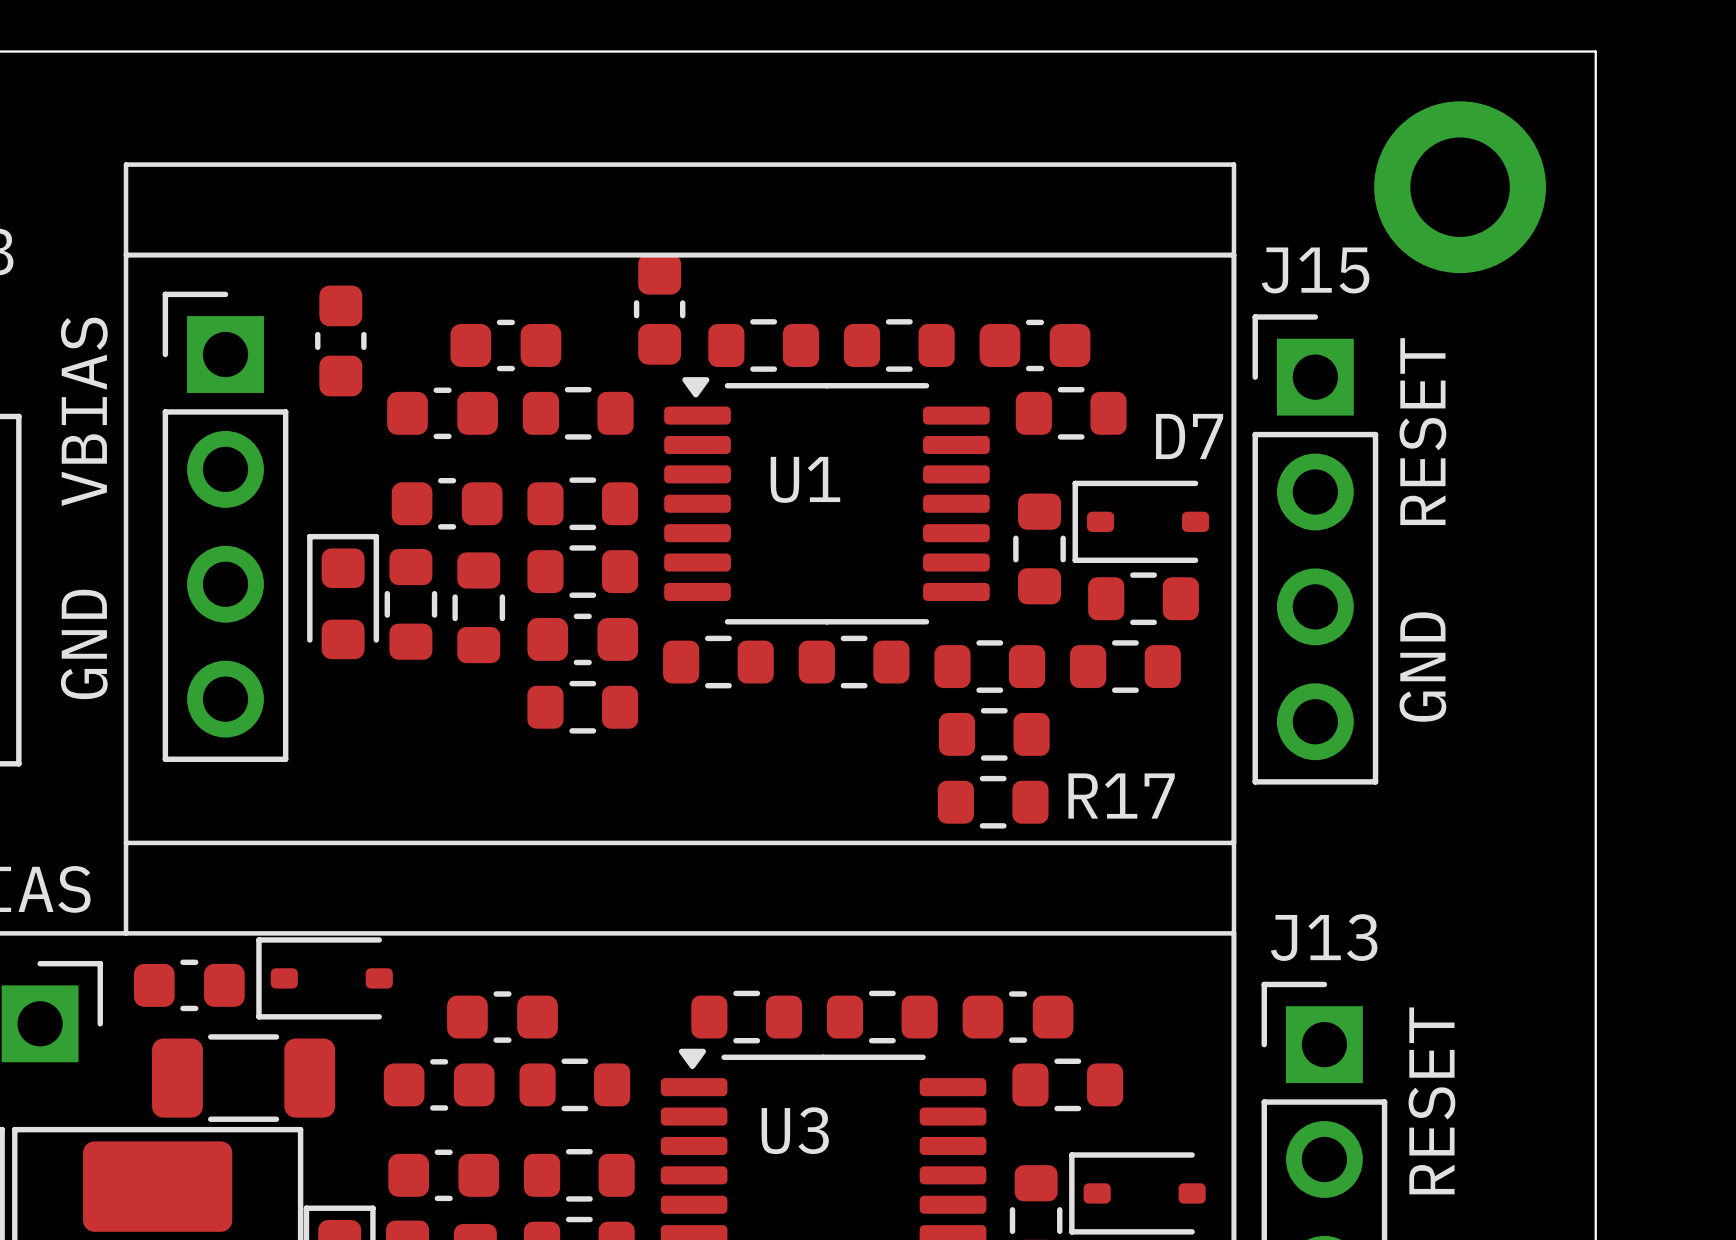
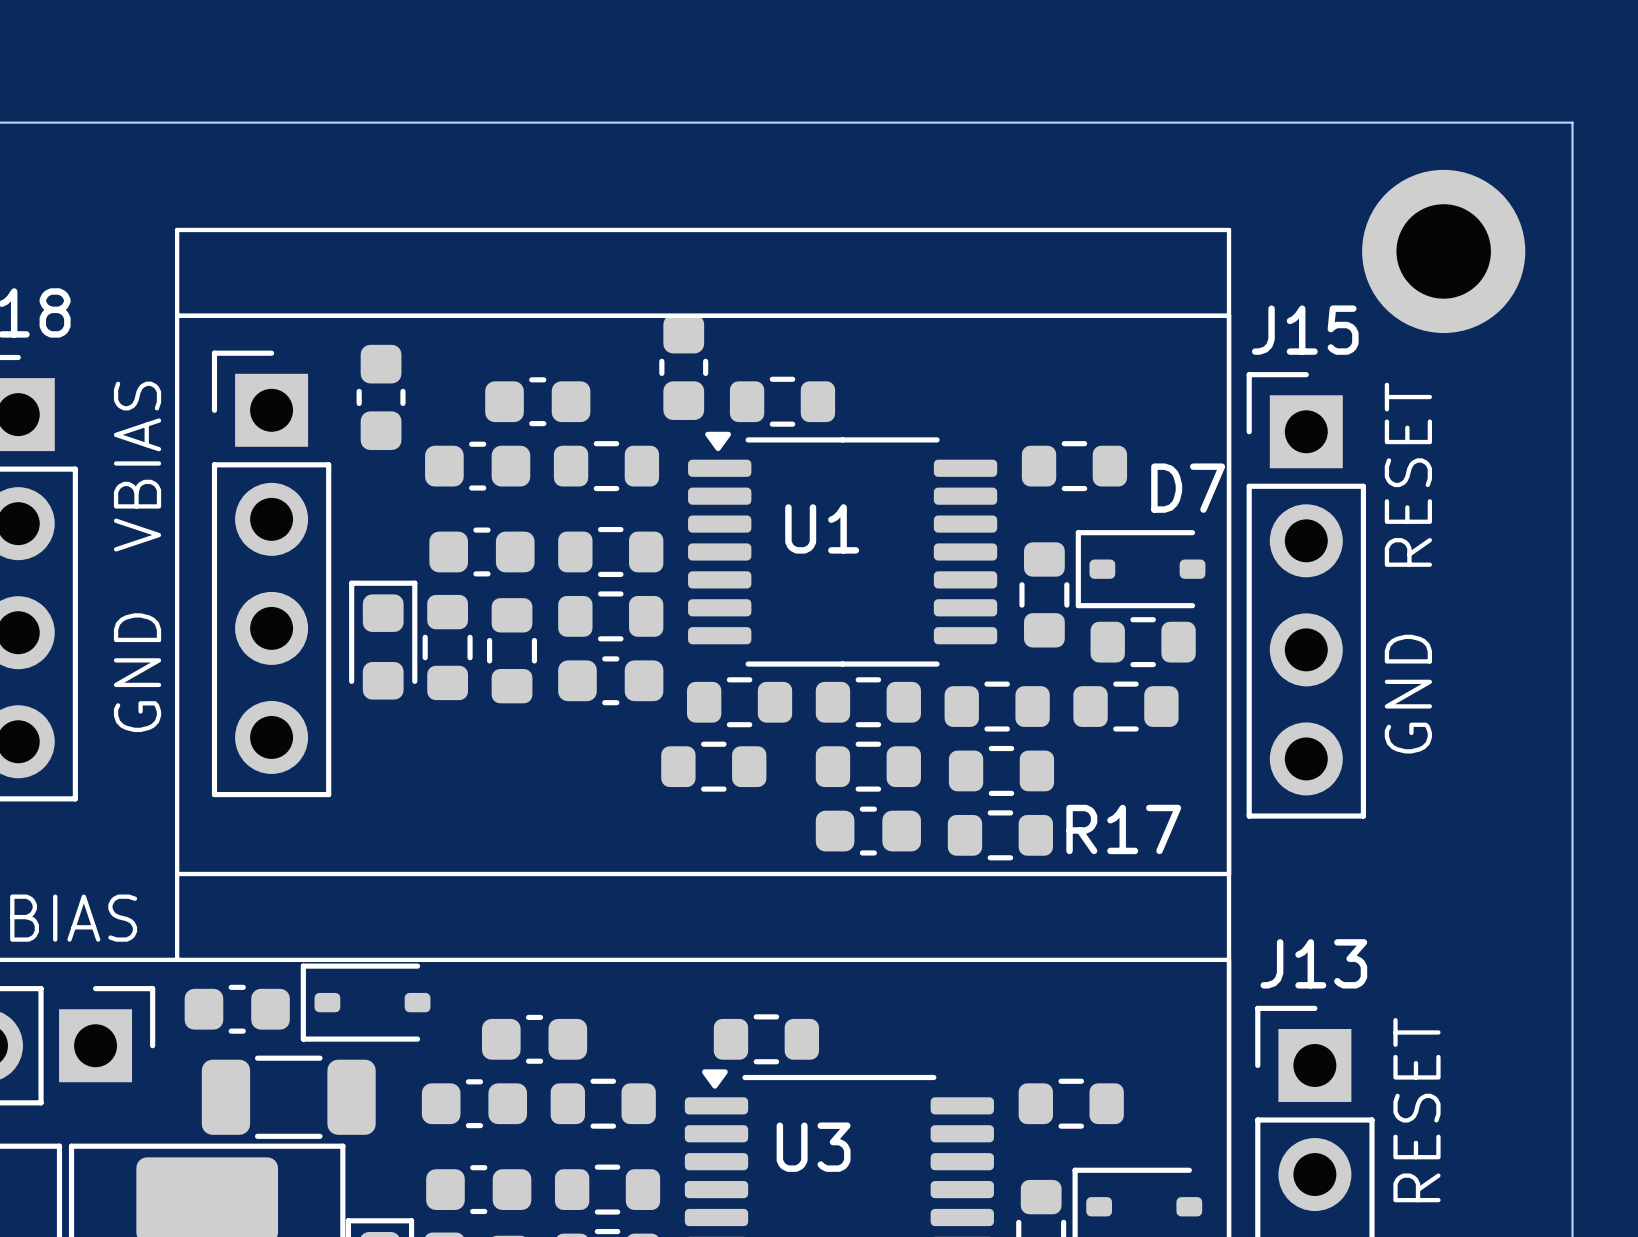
part: (899, 345) -> none
part: (1034, 345) -> none
part position: (582, 707) -> (713, 766)
part: none -> (868, 766)
part: none -> (868, 831)
part: (882, 1017) -> none
part: (1018, 1017) -> none

